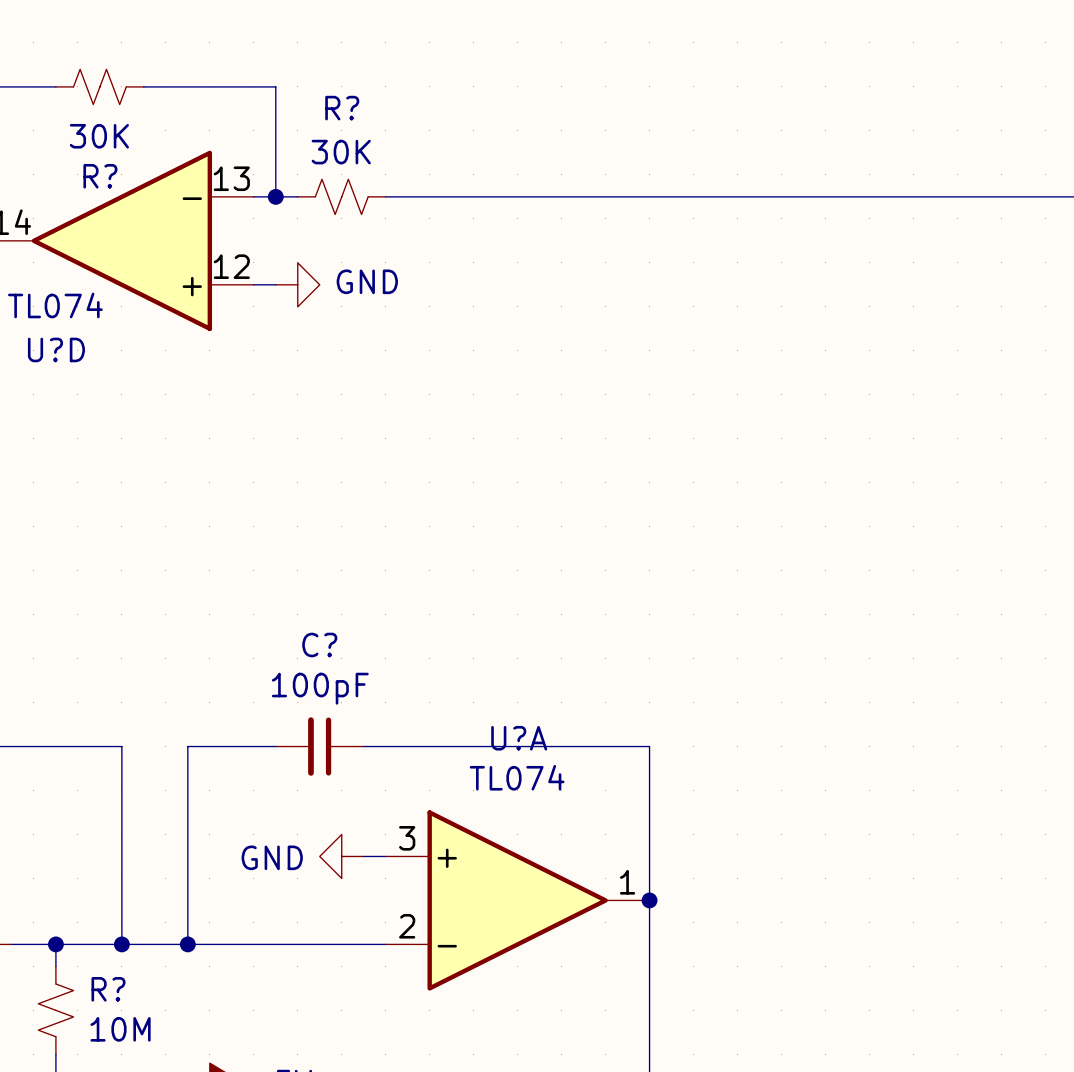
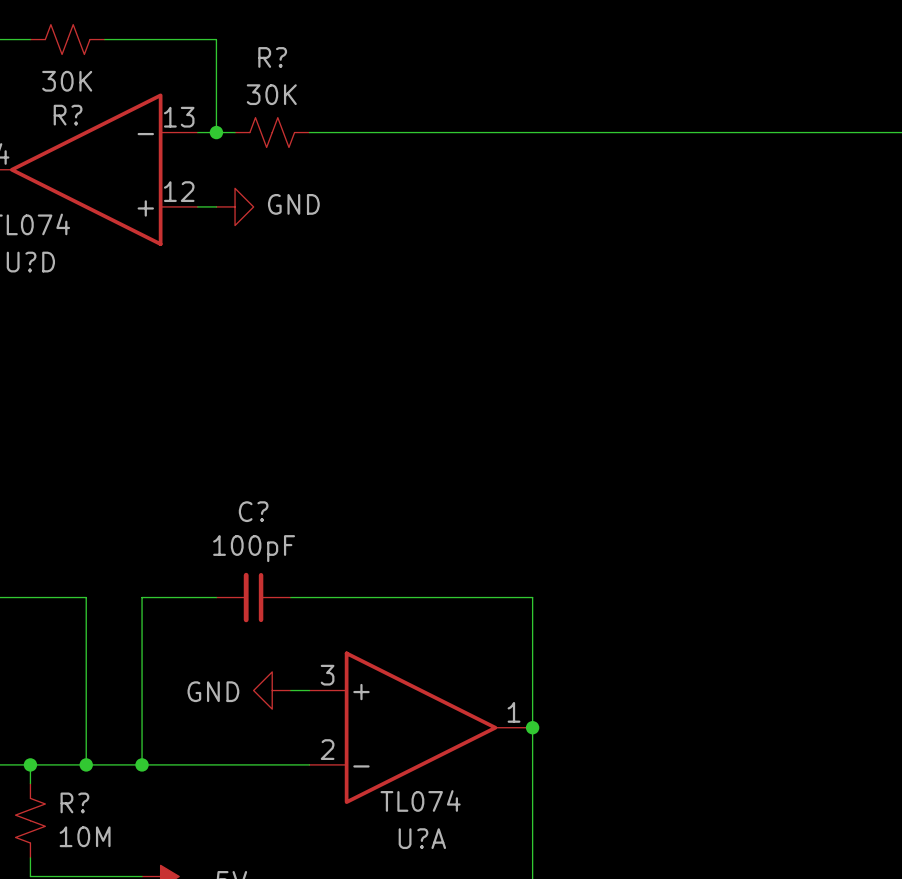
U?A name position: U?A (519, 738) -> U?A (422, 838)
U?A value position: TL074 (517, 777) -> TL074 (420, 800)

